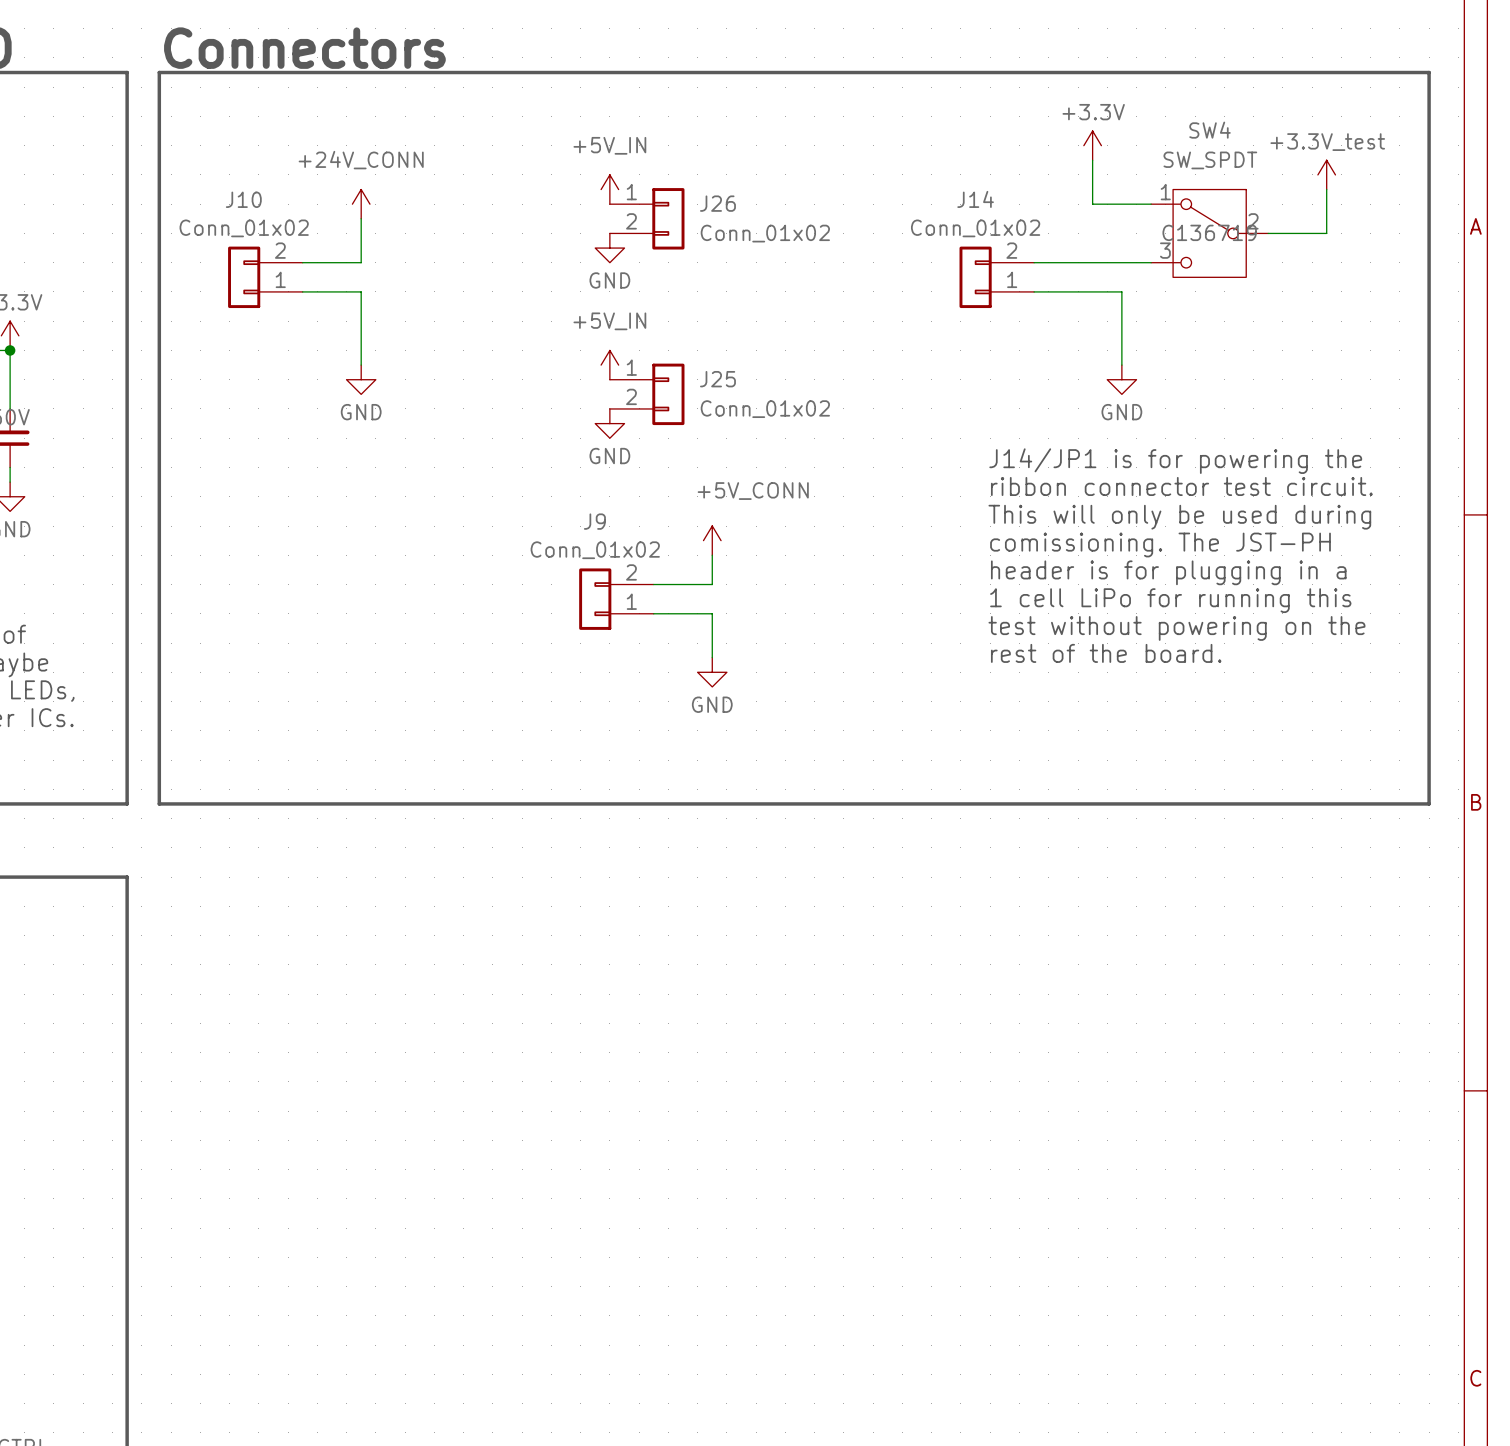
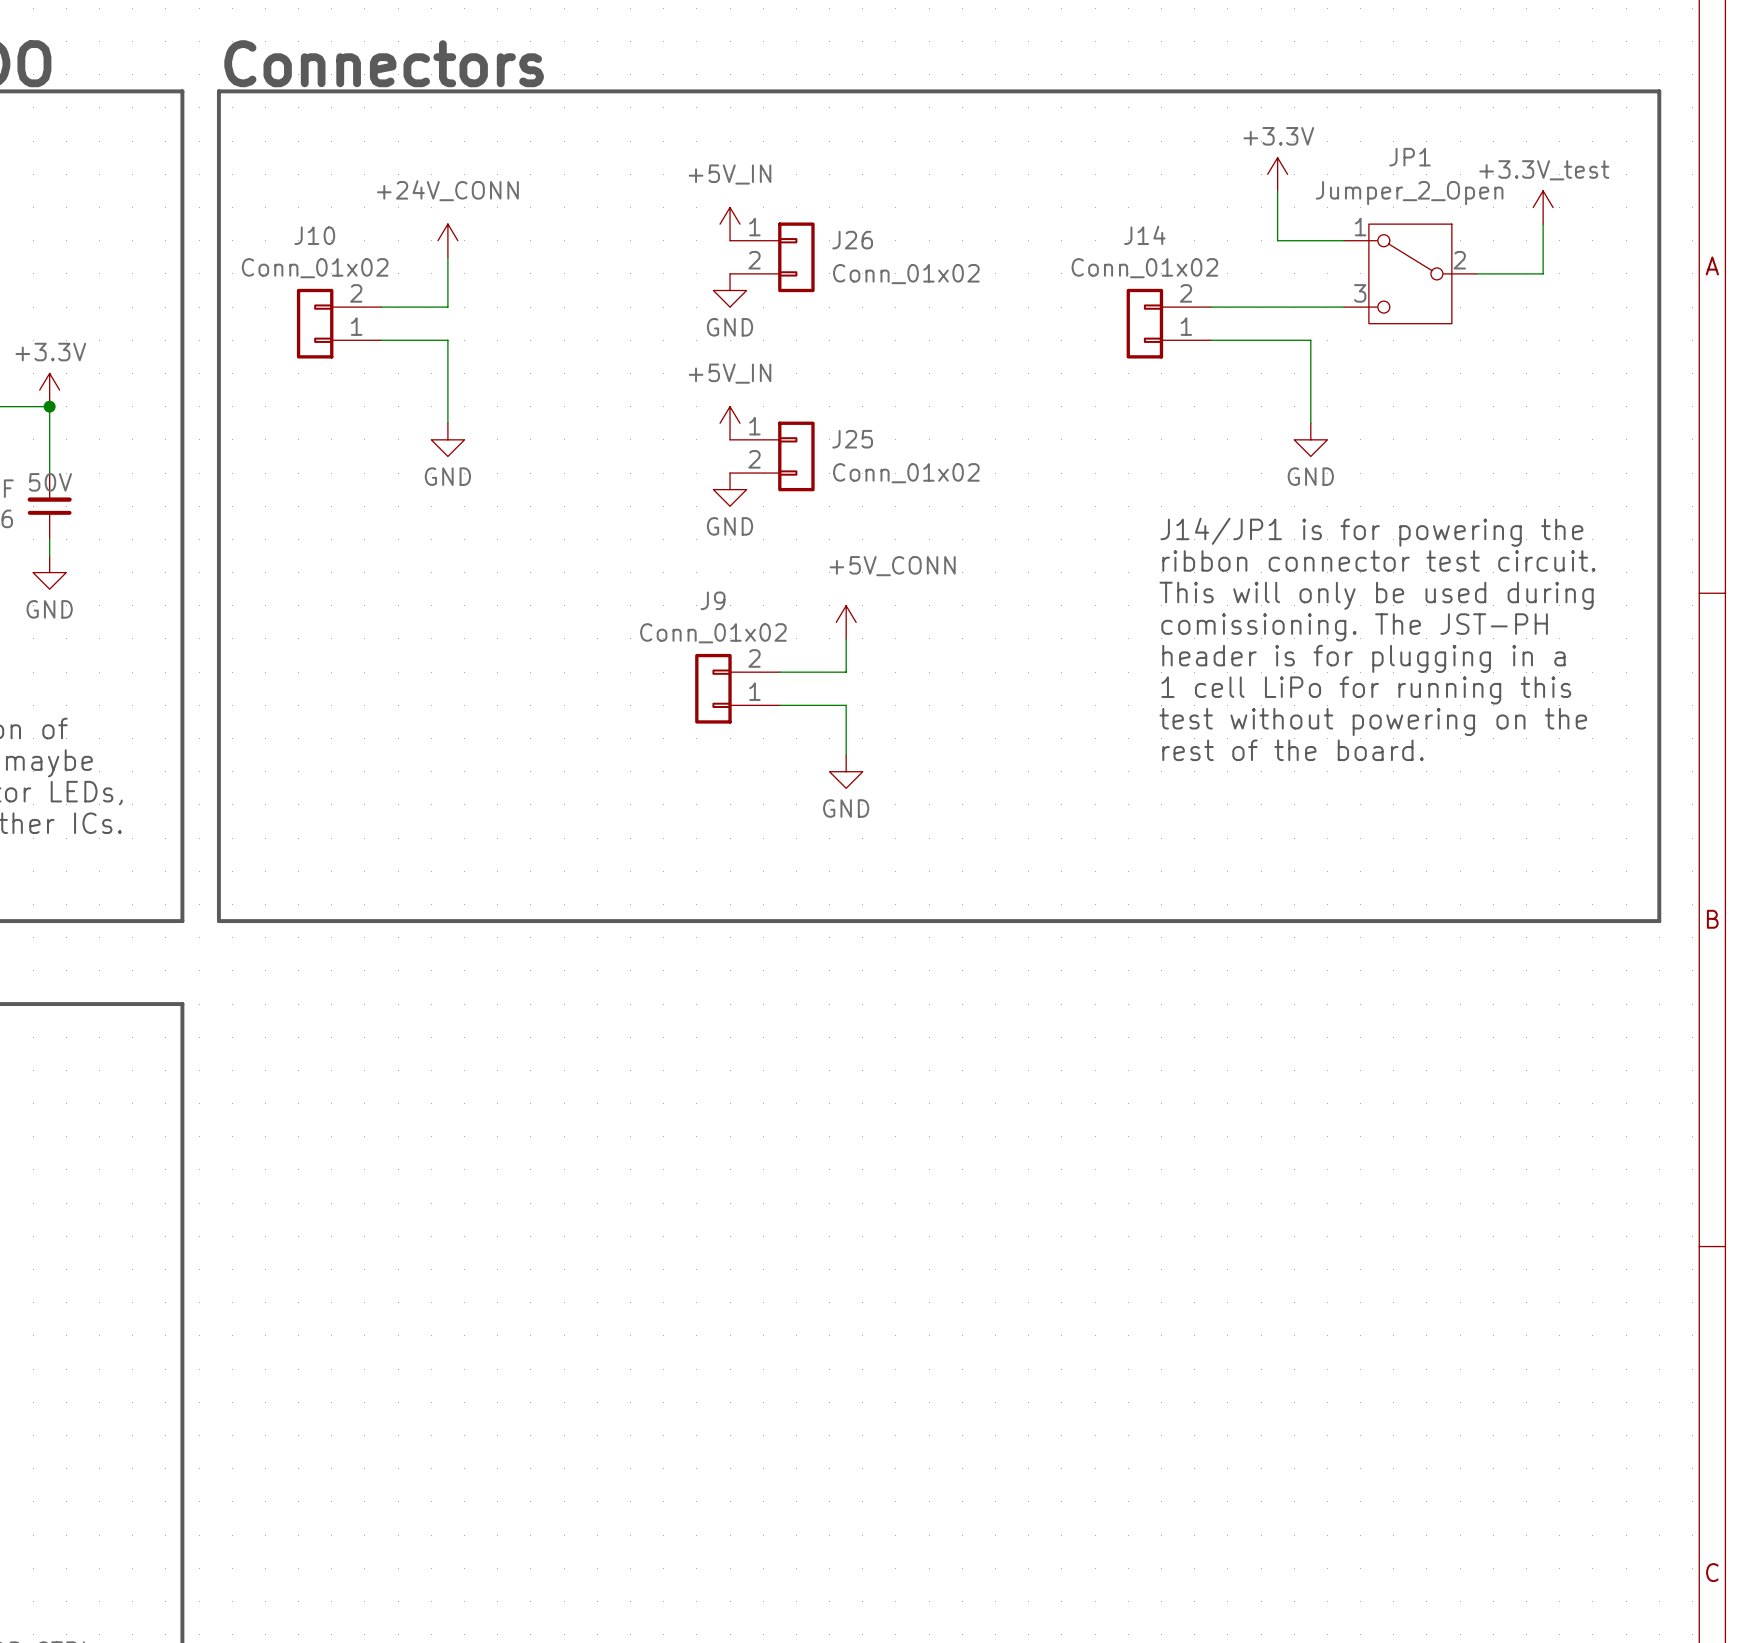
SW4 name: SW4 (1210, 130) -> JP1 (1409, 157)
SW4 value: SW_SPDT (1210, 160) -> Jumper_2_Open (1409, 193)
SW4 text: C136719 (1209, 232) -> none

